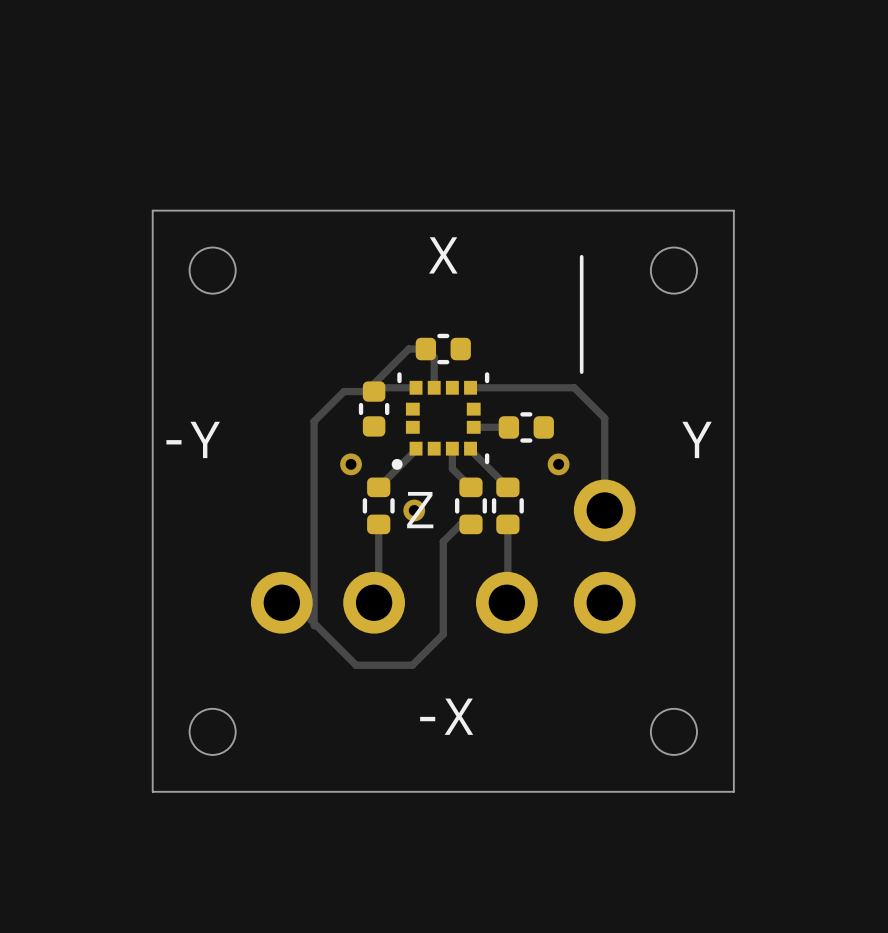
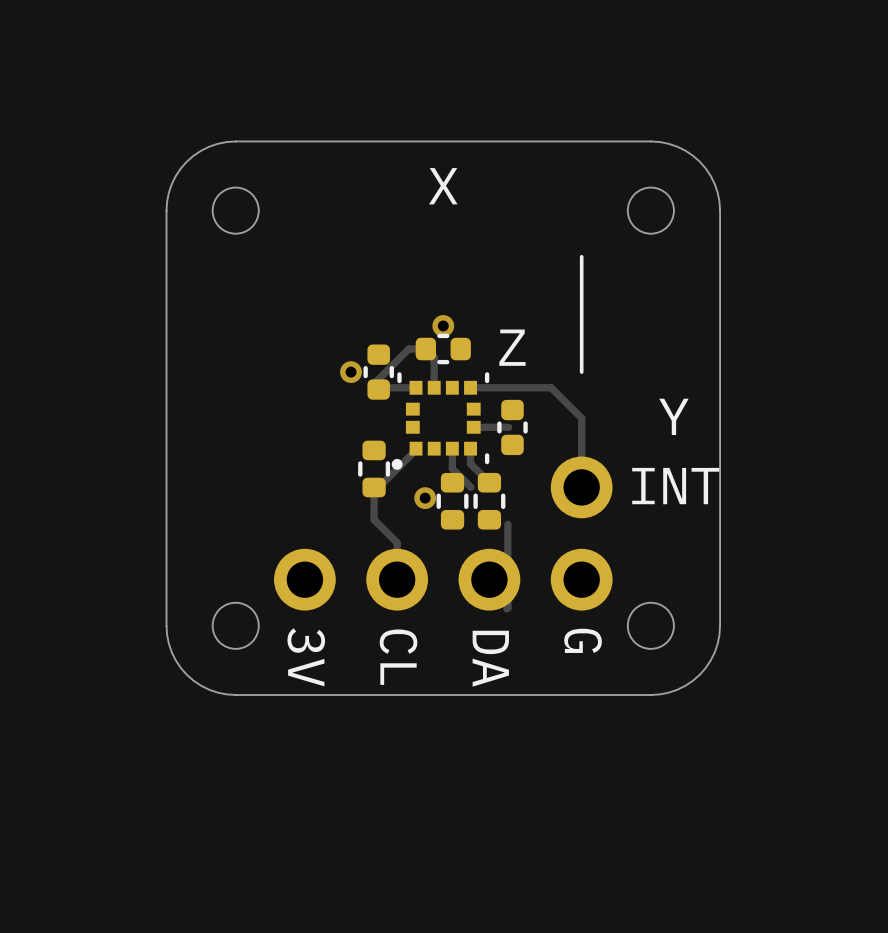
round board edge: none -> [626, 186, 675, 235]
board edge: (152, 210) (152, 791) (733, 791) (733, 210) (152, 210) -> (235, 141) (217, 143) (193, 155) (175, 176) (167, 201) (166, 625) (171, 652) (180, 667) (201, 685) (217, 692) (235, 695) (650, 695) (668, 692) (693, 680) (710, 660) (717, 643) (720, 625) (720, 210) (714, 184) (705, 168) (685, 150) (668, 143) (650, 141) (235, 141)
round board edge: [649, 246, 698, 295] -> none
text position: X (443, 255) -> X (443, 186)
round board edge position: (212, 270) -> (235, 210)
via: none -> (443, 325)
via: none -> (351, 372)
track: (551, 387) (574, 387) (604, 418) (604, 510) -> (551, 387) (581, 418) (581, 487)
track: (374, 391) (343, 391) (314, 421) (314, 625) -> none
part position: (374, 409) -> (378, 372)
part rotation: 0° (526, 427) -> 90° clockwise (512, 427)
text: -Y (193, 439) -> none
text position: Y (697, 439) -> Y (673, 416)
track: (470, 450) (507, 487) -> (470, 450) (470, 463) (489, 482)
via: (351, 464) -> none
via: (558, 464) -> none
part: none -> (374, 468)
text: none -> INT (676, 486)
track: none -> (374, 487) (374, 519) (397, 542) (397, 588)
part: none -> (452, 501)
part: none -> (489, 501)
part: (378, 505) -> none
part: (470, 505) -> none
part: (507, 505) -> none
via position: (414, 510) -> (425, 498)
text position: Z (420, 510) -> Z (512, 347)
part position: (604, 510) -> (581, 487)
track: (378, 524) (378, 575) (374, 579) (374, 602) -> none
track: (470, 524) (460, 524) (443, 541) (443, 634) (412, 665) (356, 665) (298, 607) -> none
round board edge: none -> [211, 601, 260, 650]
round board edge: none -> [626, 601, 675, 650]
part position: (281, 602) -> (304, 579)
part position: (374, 602) -> (397, 579)
part position: (506, 602) -> (489, 579)
part position: (604, 602) -> (581, 579)
text: none -> G (583, 640)
text: none -> 3V (306, 657)
text: none -> CL (398, 657)
text: none -> DA (490, 658)
round board edge: [188, 707, 237, 756] -> none
round board edge: [649, 707, 698, 756] -> none
text: -X (446, 716) -> none

